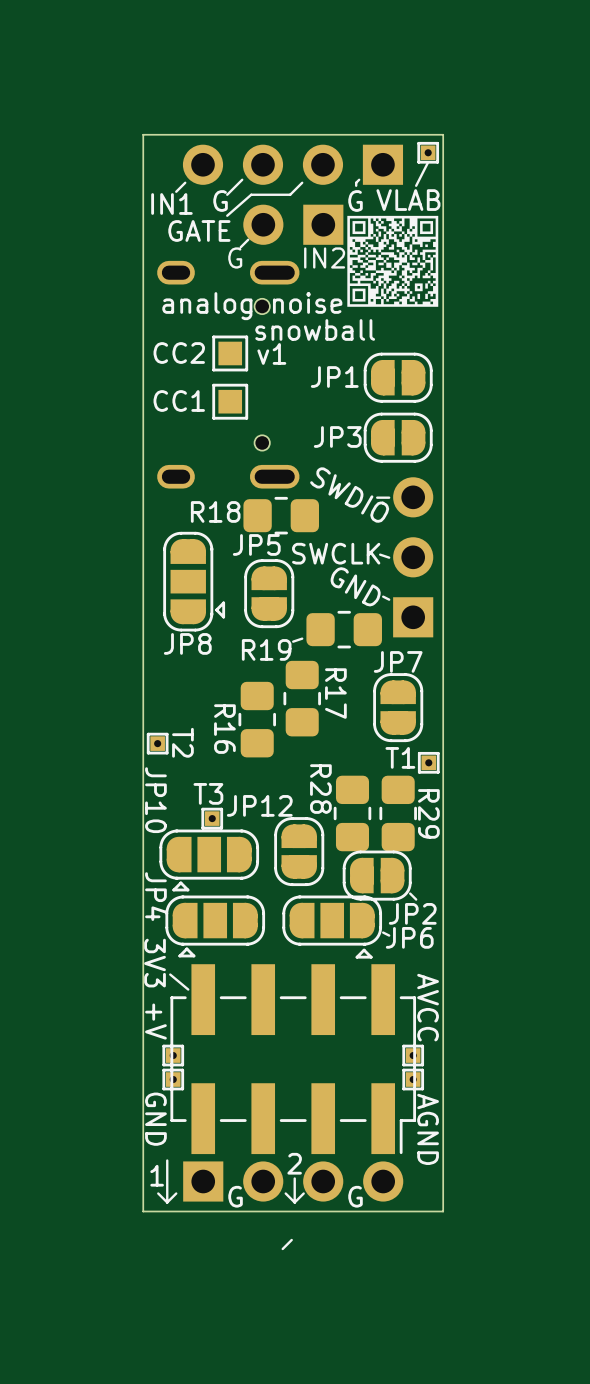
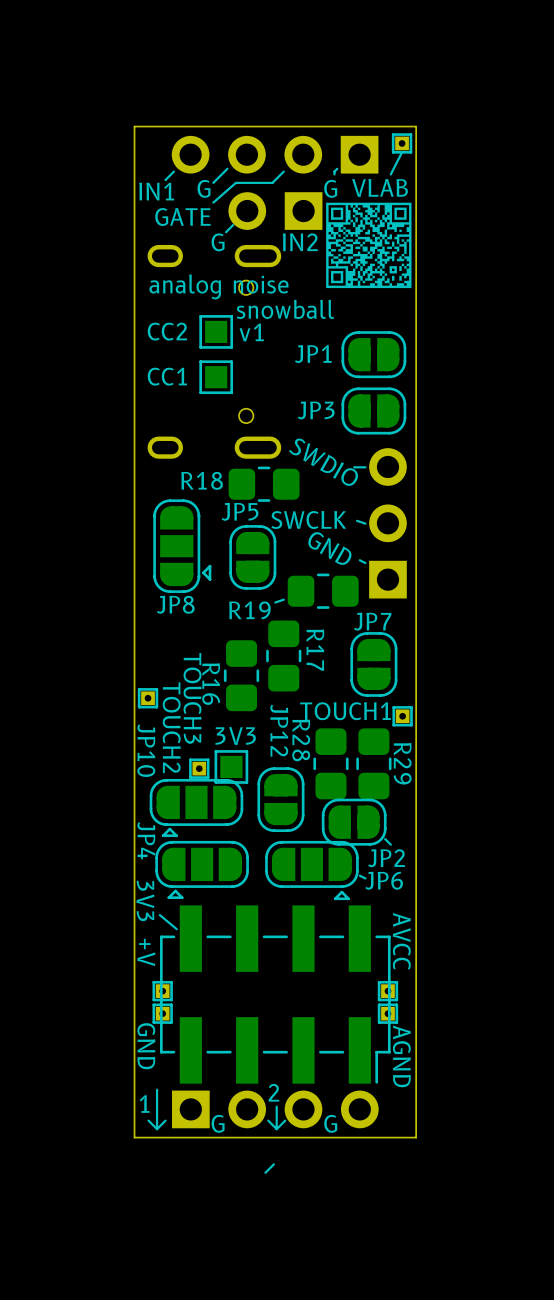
part value: T2 (182, 742) -> TOUCH2 (171, 727)
part value: T1 (400, 757) -> TOUCH1 (345, 711)
part value: T3 (208, 793) -> TOUCH3 (192, 698)
JP12 name rotation: 0° (259, 805) -> 90° clockwise (279, 730)
part: none -> 3V3 (231, 766)

